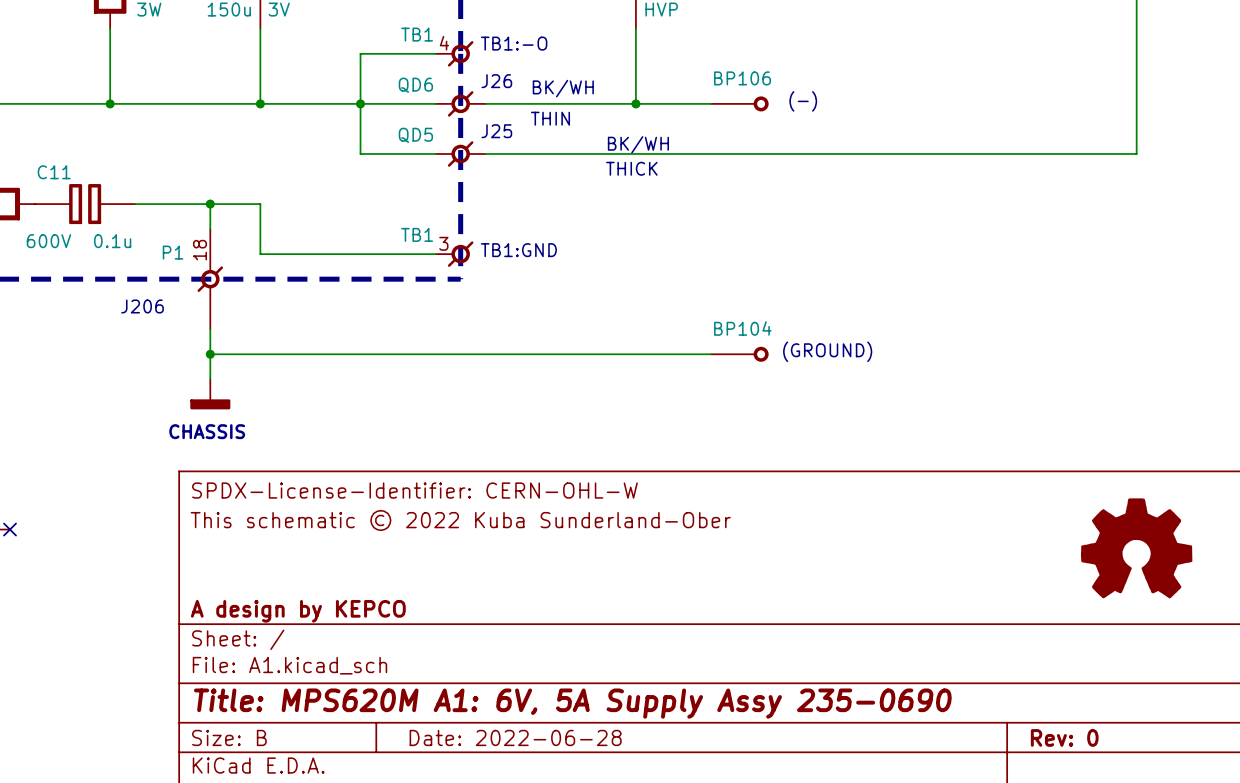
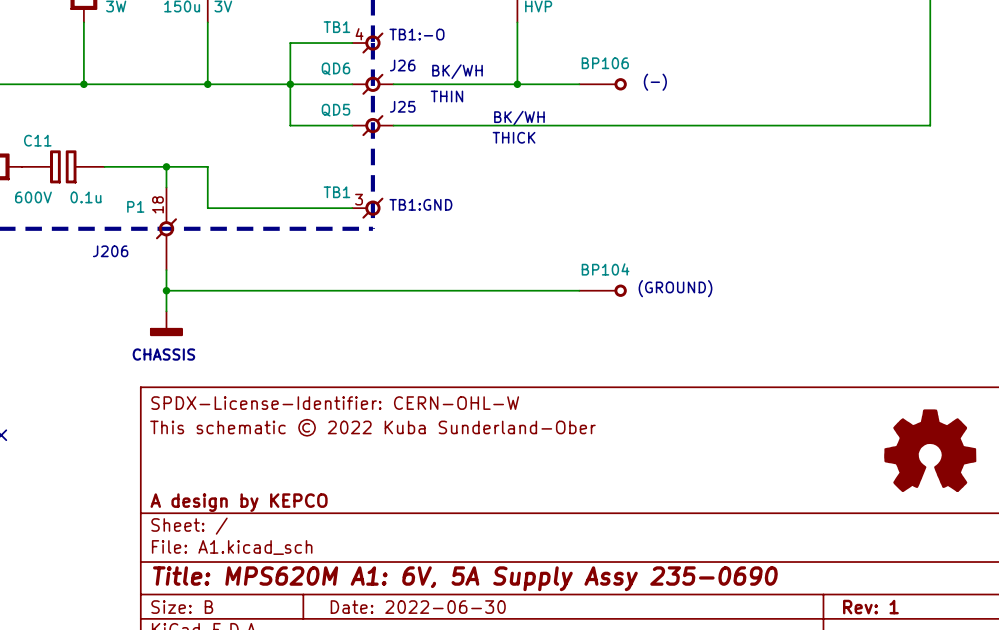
title block: Date: 2022-06-28 (515, 737) -> Date: 2022-06-30 (418, 607)
title block: Rev: 0 (1064, 737) -> Rev: 1 (870, 607)

